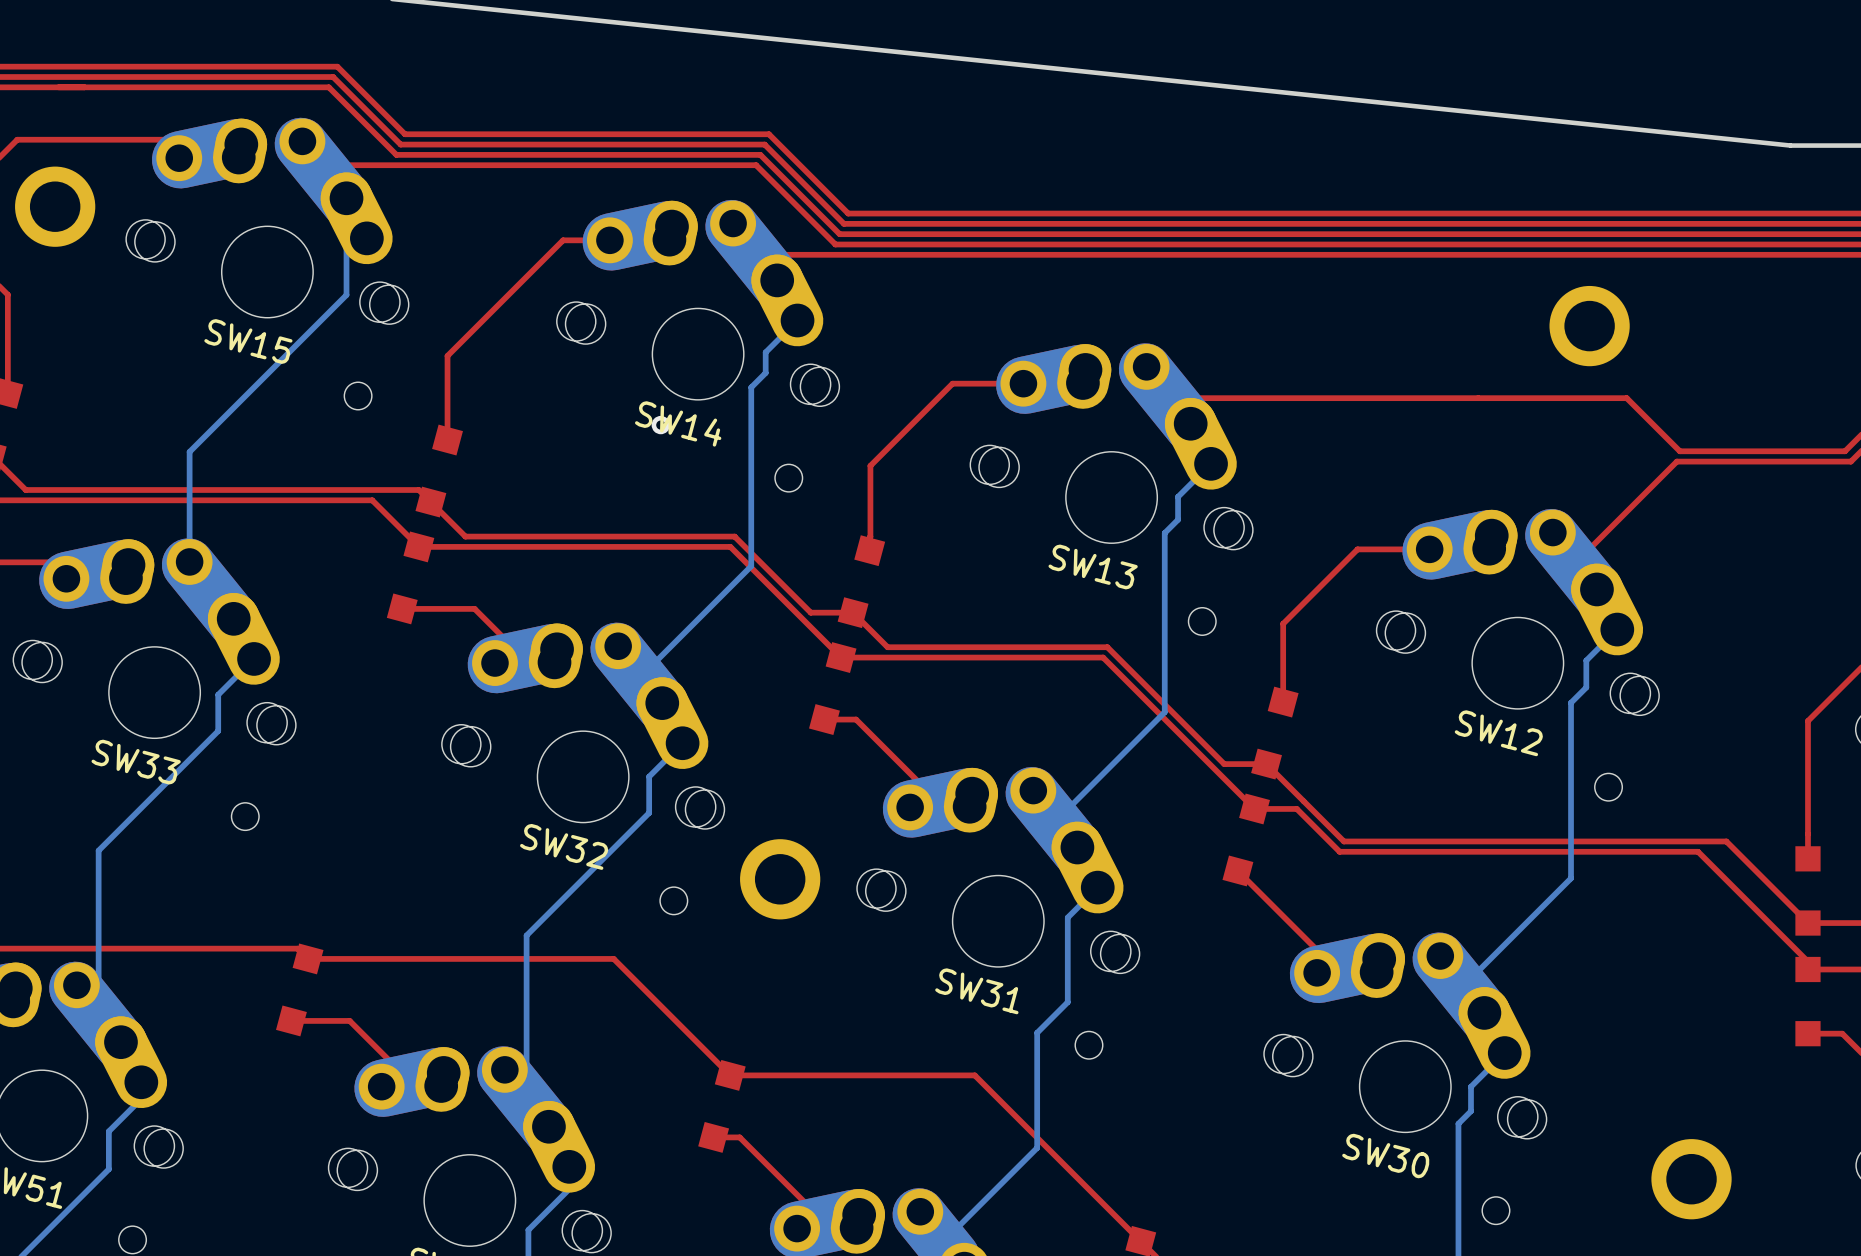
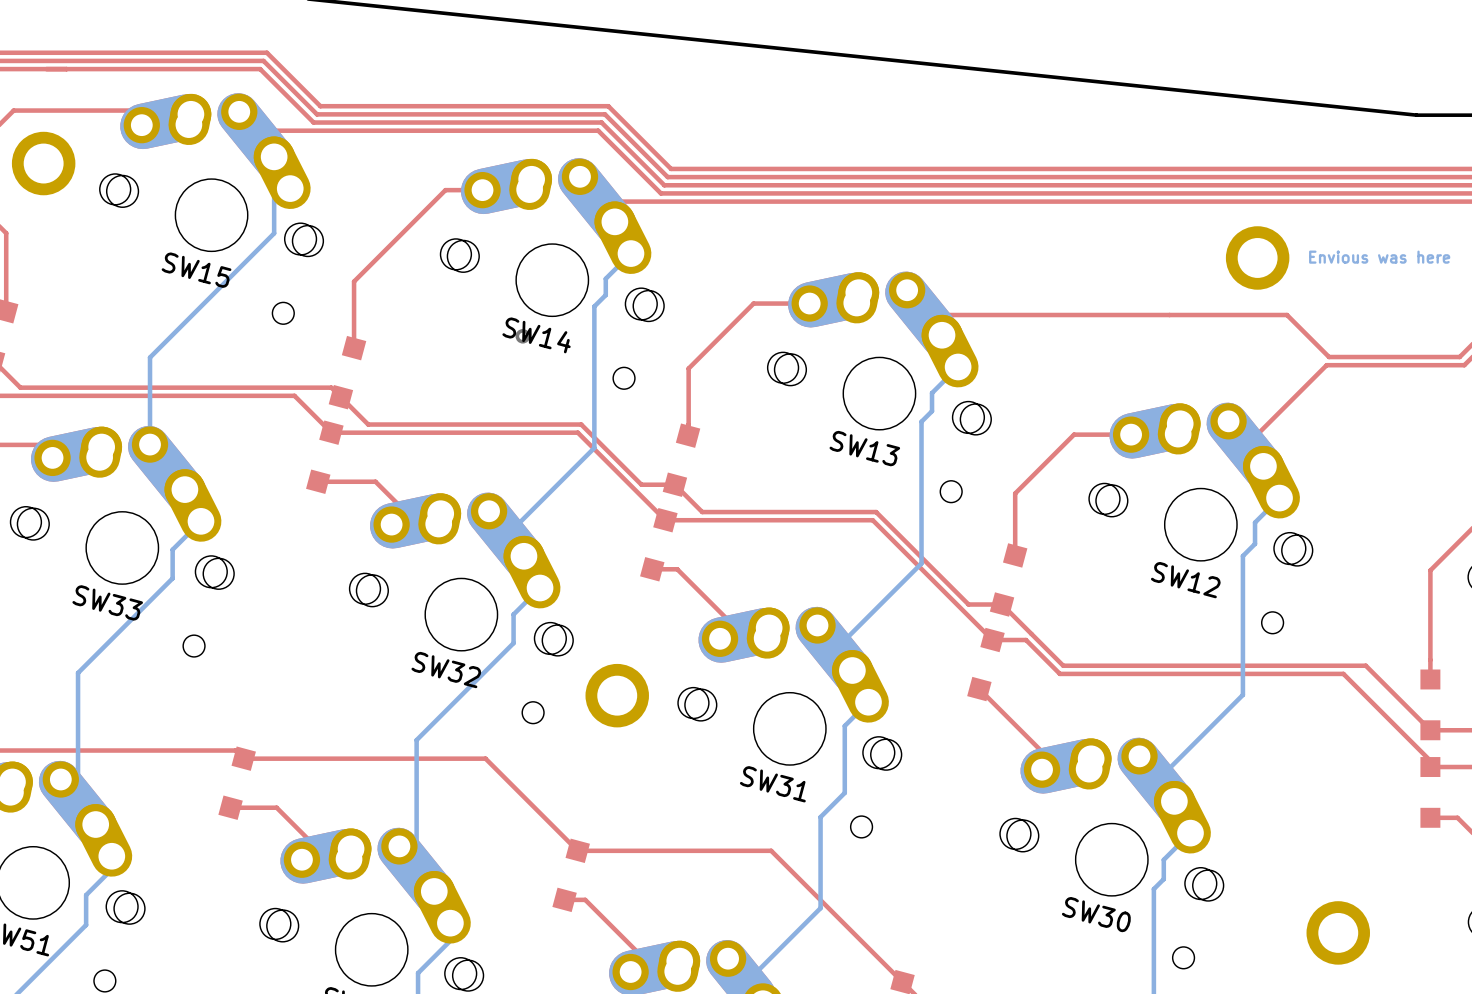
text: none -> Envious was here (1379, 257)

